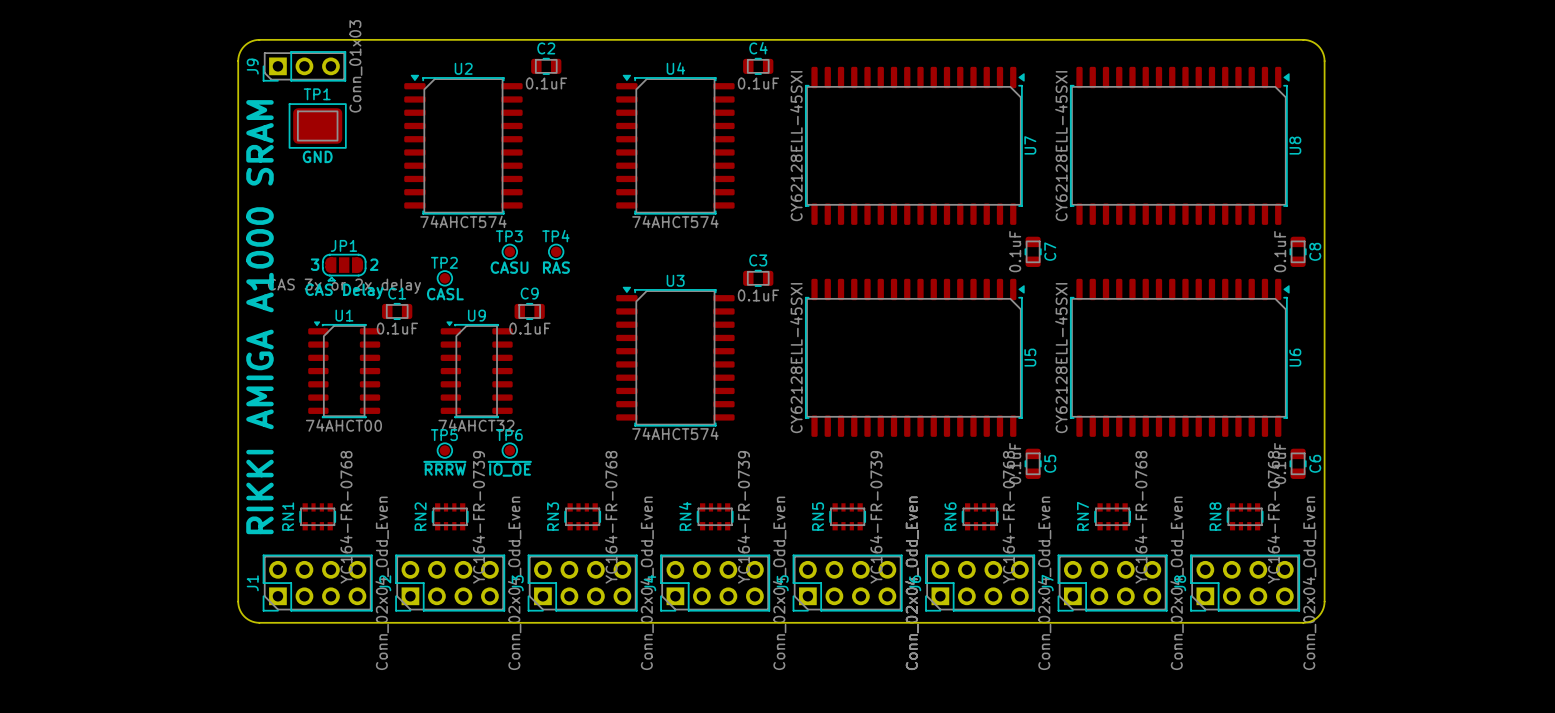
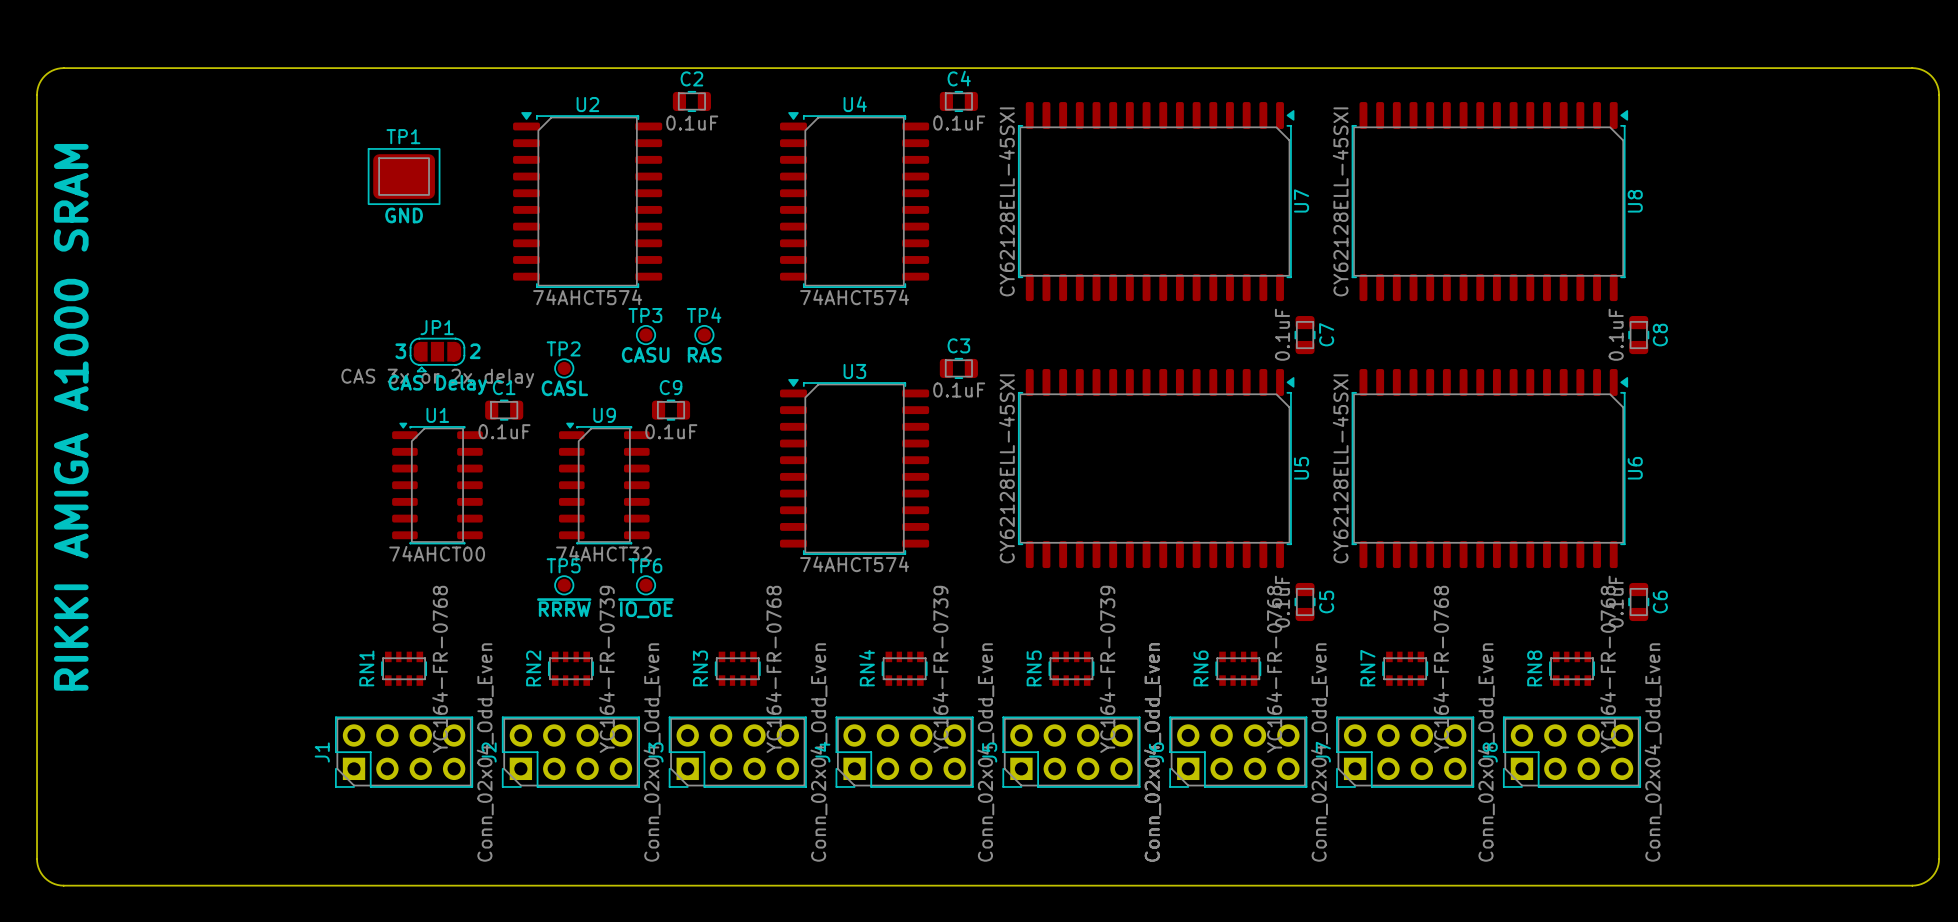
board edge: (259, 39) (250, 41) (244, 46) (239, 54) (238, 61) (238, 601) (240, 610) (244, 616) (250, 620) (259, 622) (1303, 622) (1314, 619) (1321, 612) (1324, 601) (1324, 61) (1322, 51) (1318, 46) (1310, 41) (1303, 39) -> (330, 68) (60, 68) (47, 73) (38, 85) (37, 858) (41, 873) (52, 883) (63, 885) (1921, 884) (1933, 875) (1939, 858) (1937, 85) (1929, 73) (1915, 68) (1645, 68)
J9: Conn_01x03 (304, 66) -> none
text position: RIKKI AMIGA A1000 SRAM (259, 317) -> RIKKI AMIGA A1000 SRAM (71, 417)

